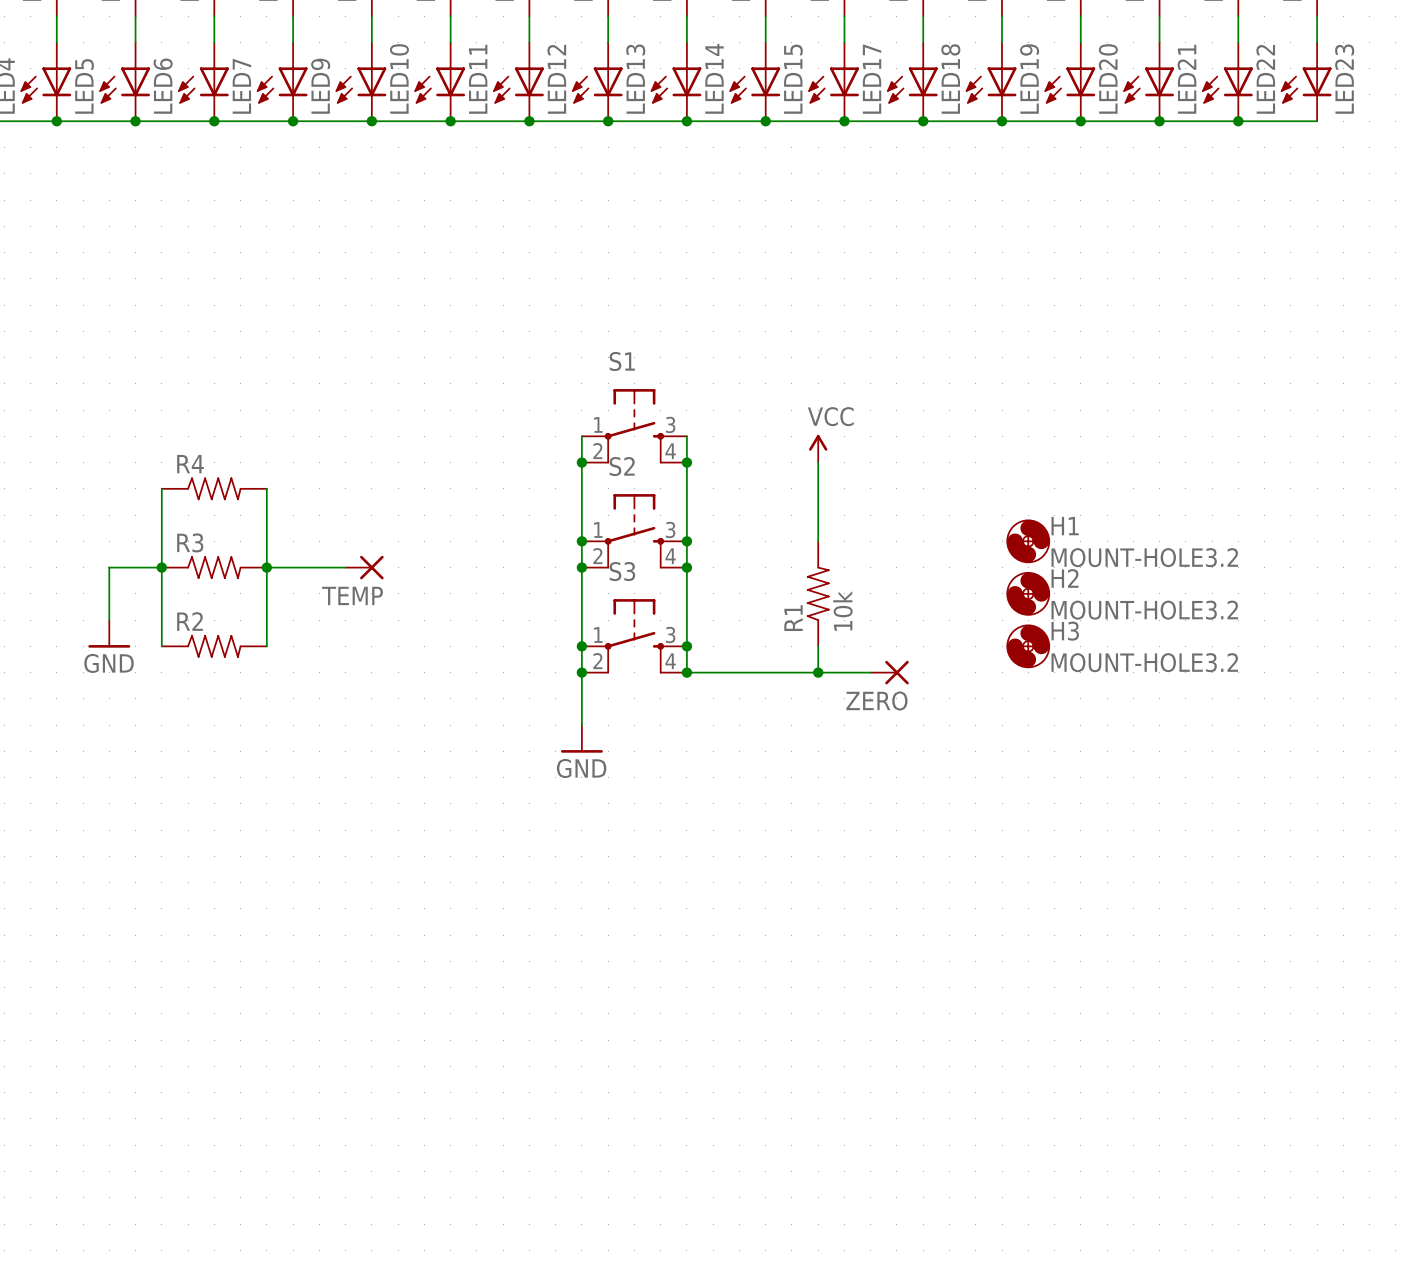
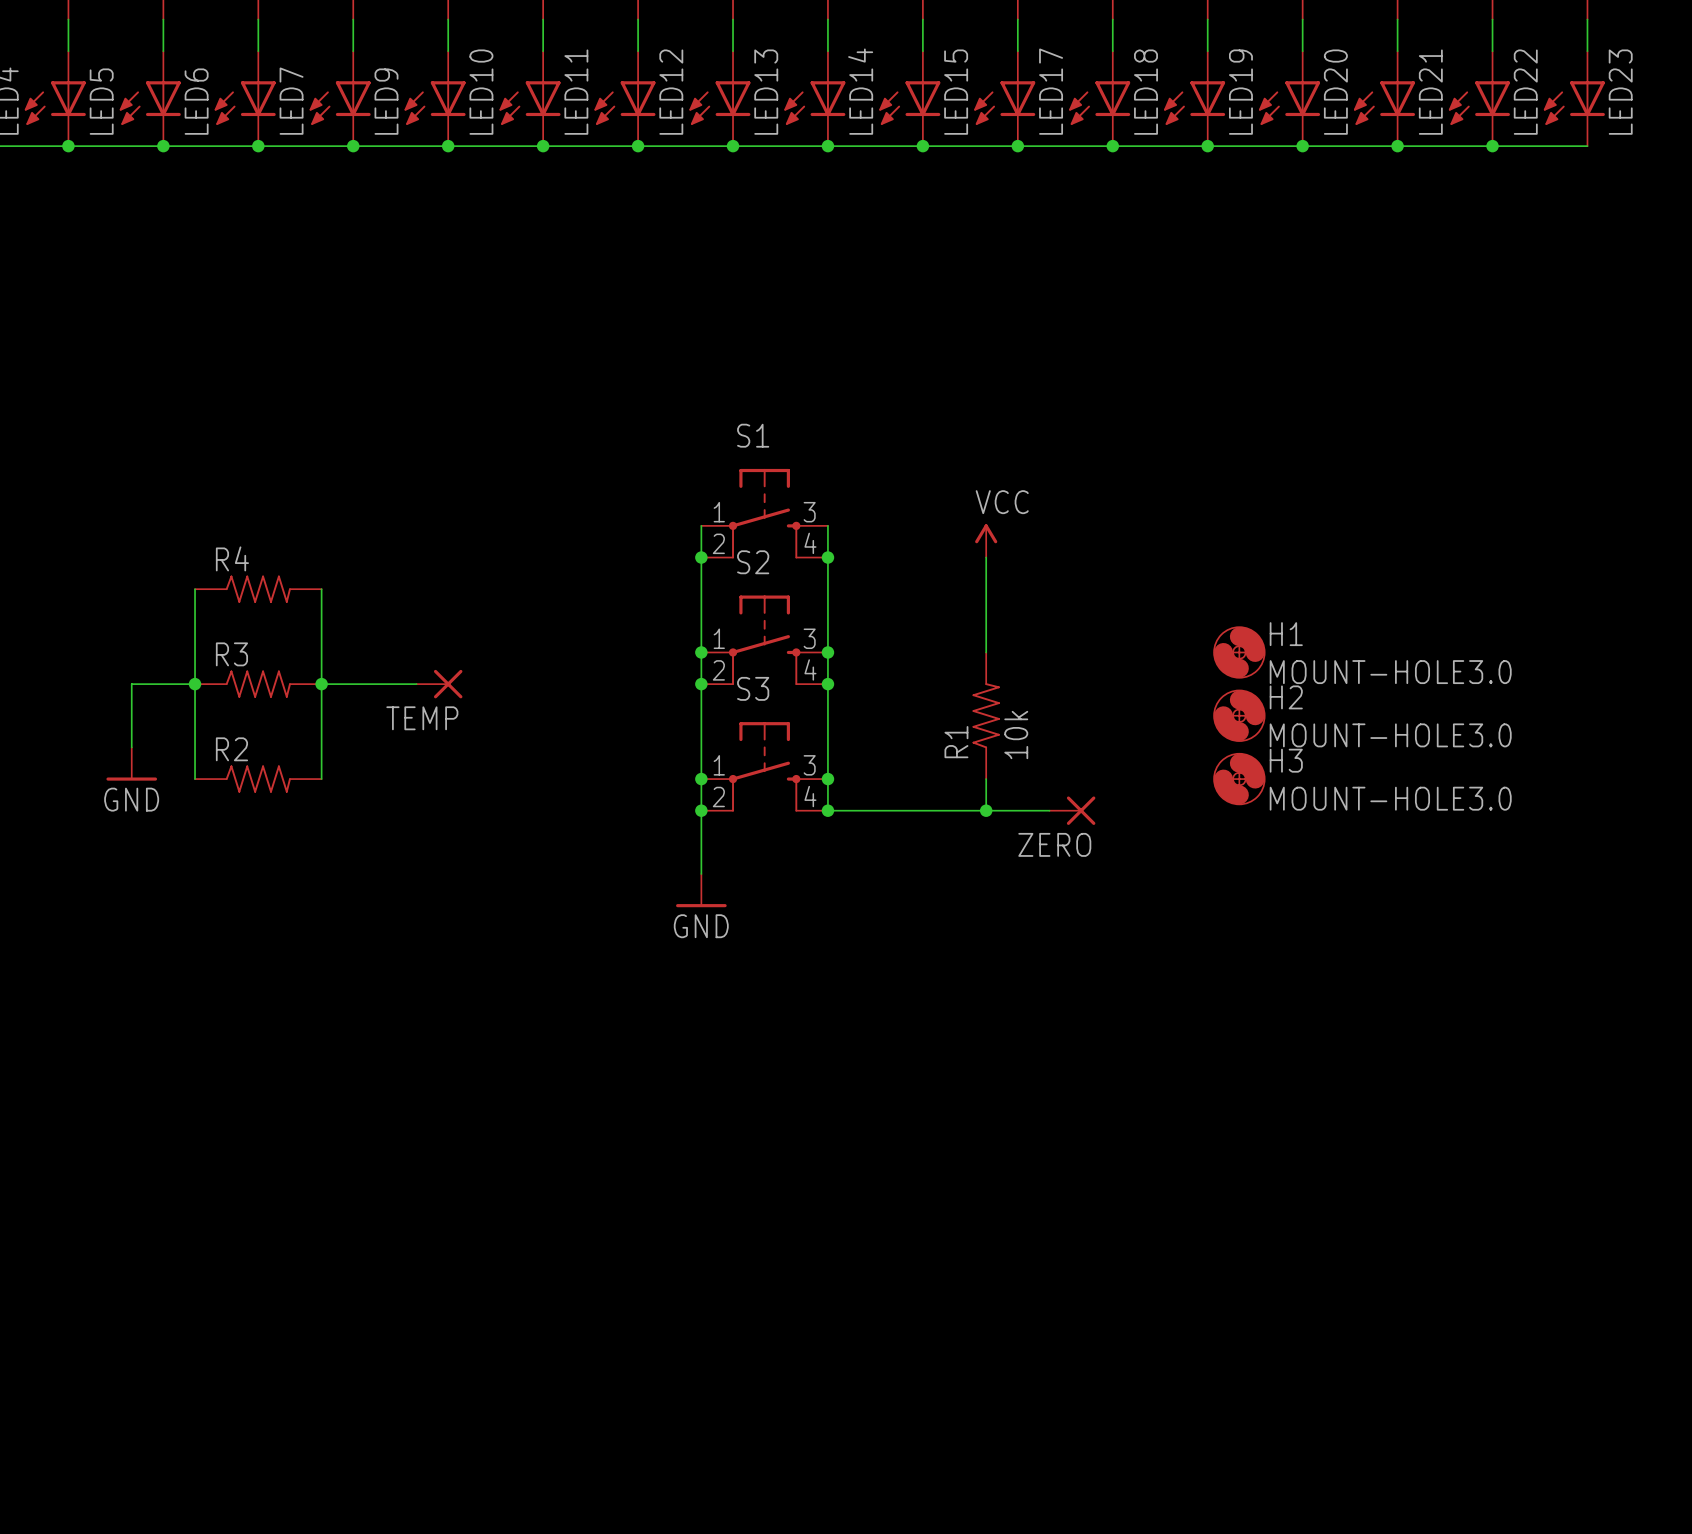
H1 value: MOUNT-HOLE3.2 (1144, 557) -> MOUNT-HOLE3.0 (1390, 672)
H2 value: MOUNT-HOLE3.2 (1144, 610) -> MOUNT-HOLE3.0 (1390, 735)
H3 value: MOUNT-HOLE3.2 (1144, 662) -> MOUNT-HOLE3.0 (1390, 798)

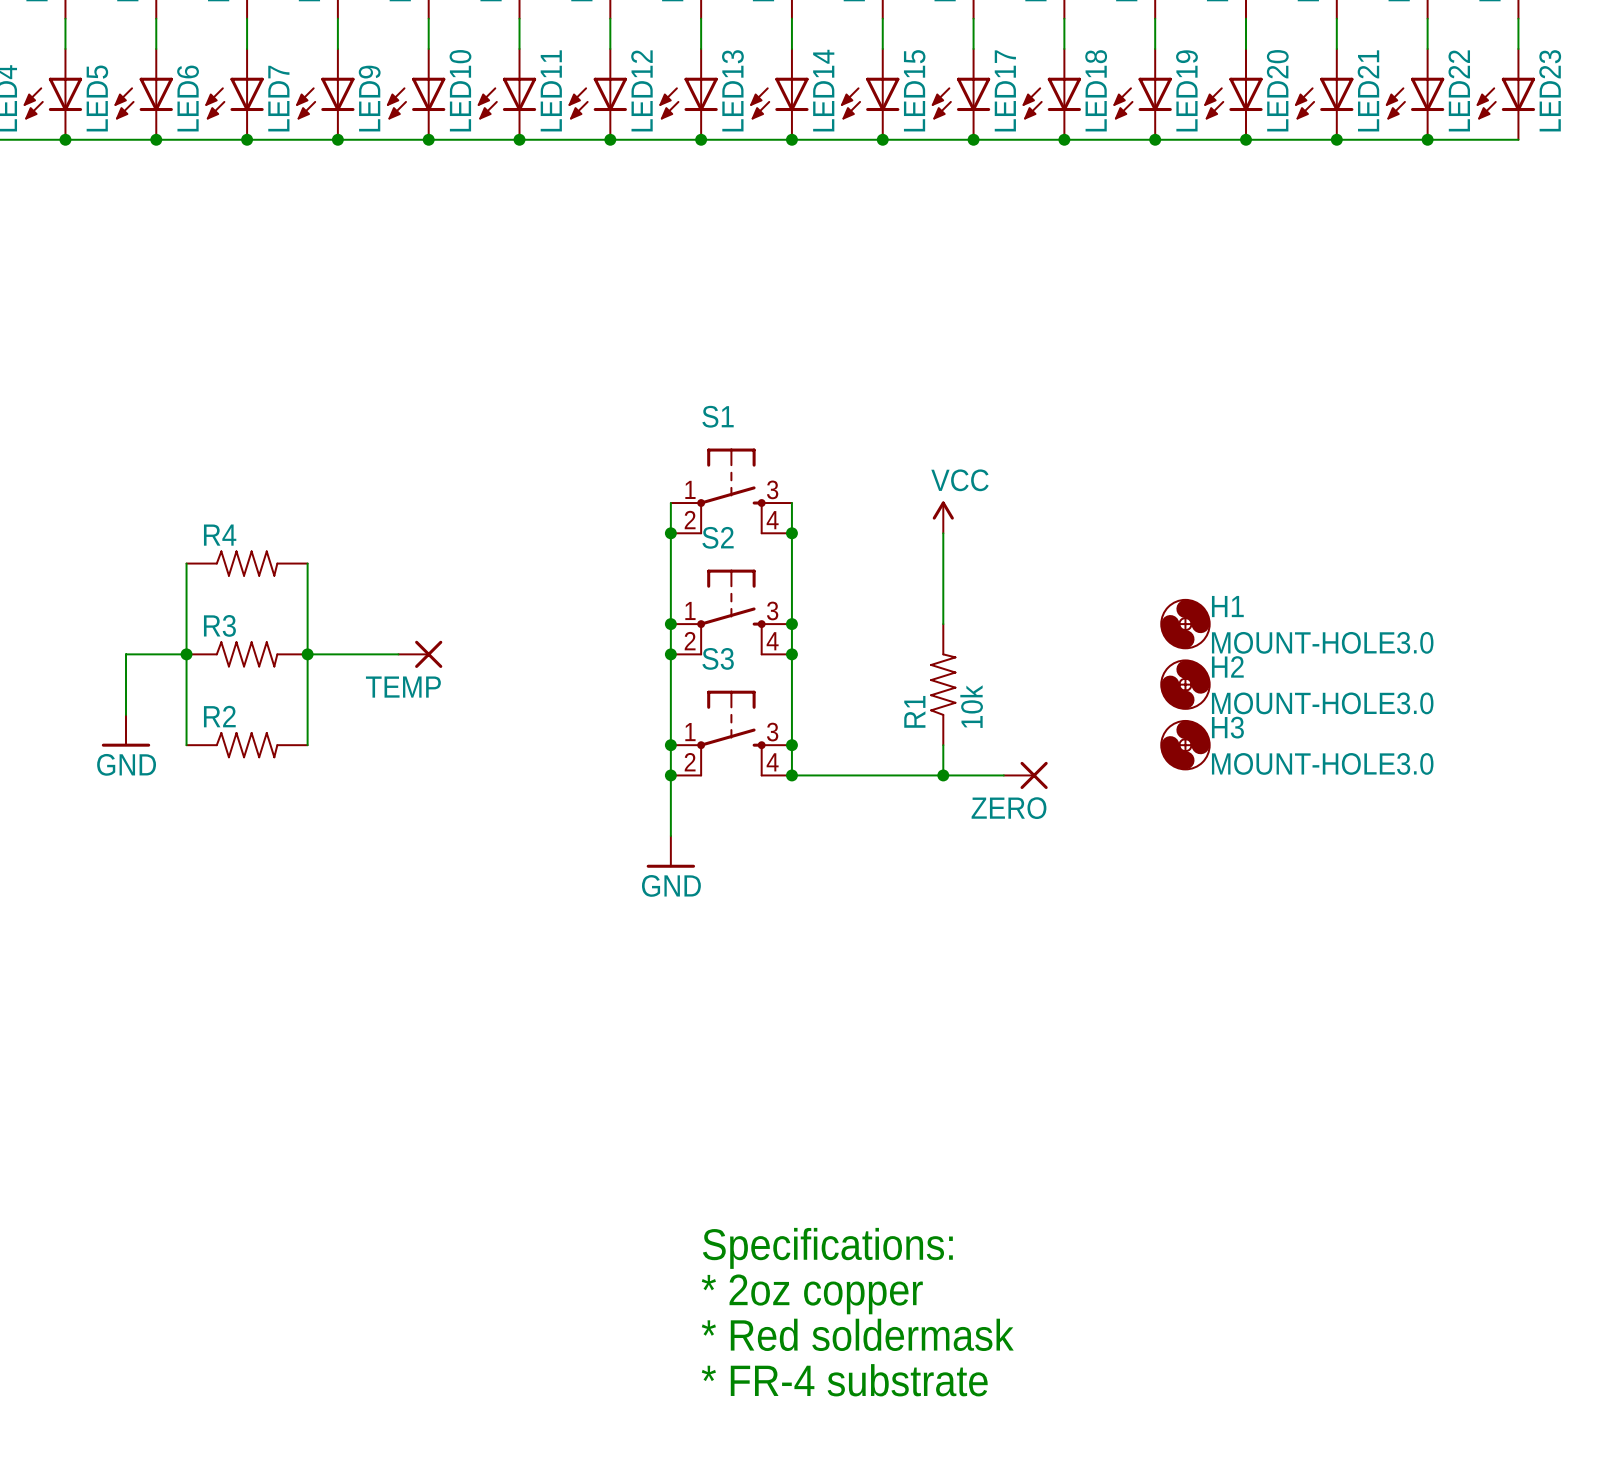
text: none -> Specifications: (827, 1248)
text: none -> * 2oz copper (812, 1294)
text: none -> * Red soldermask (857, 1334)
text: none -> * FR-4 substrate (844, 1380)

